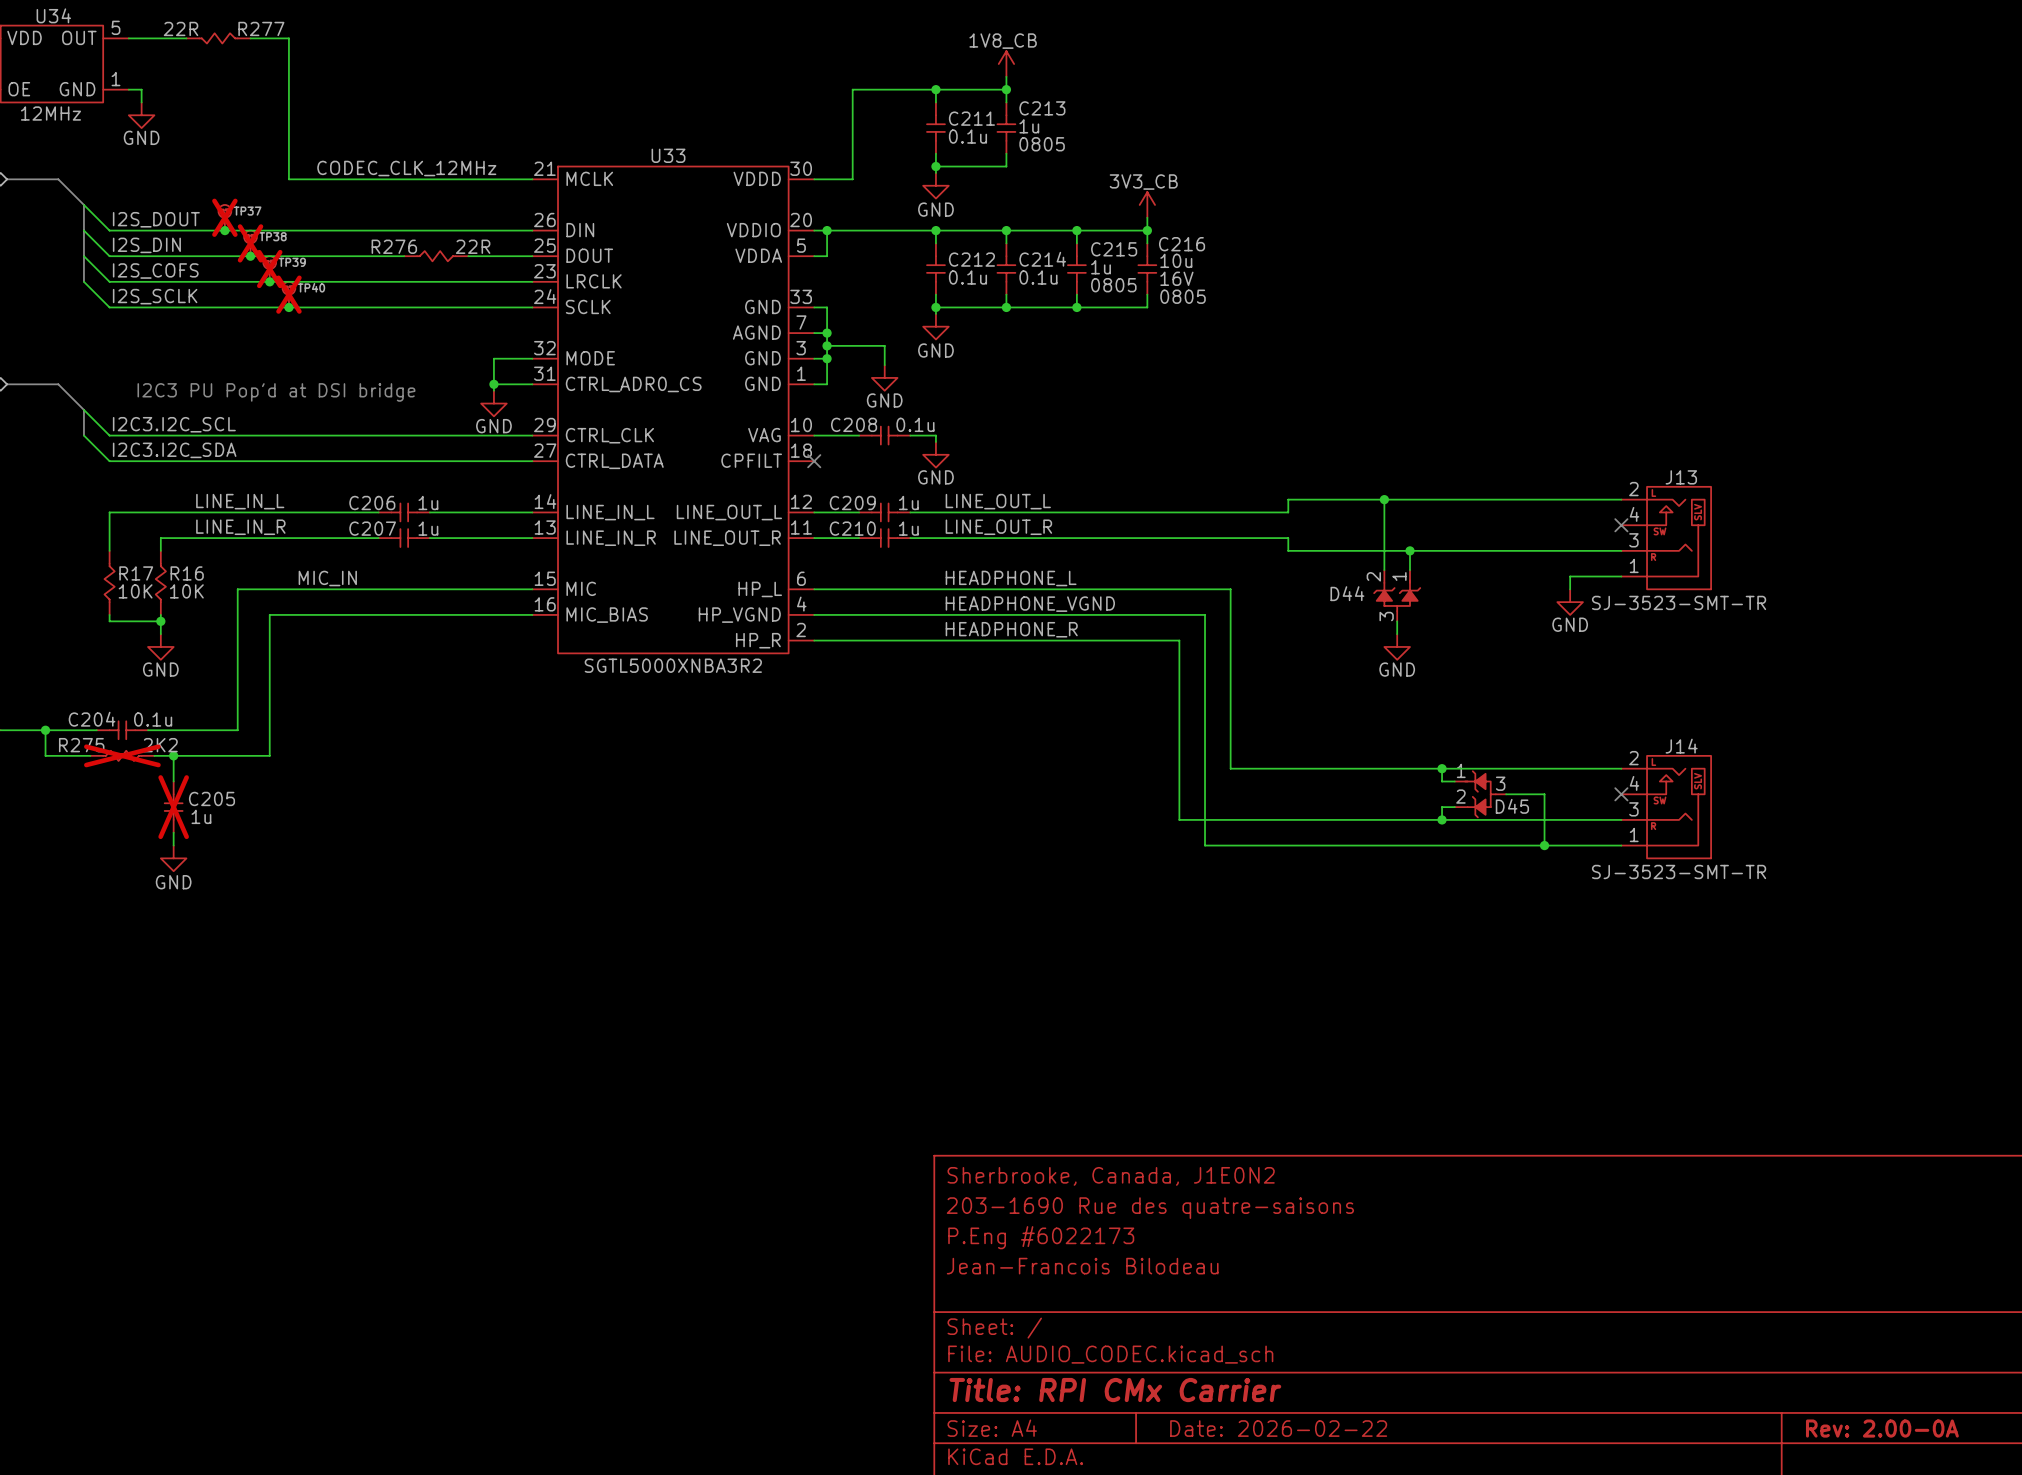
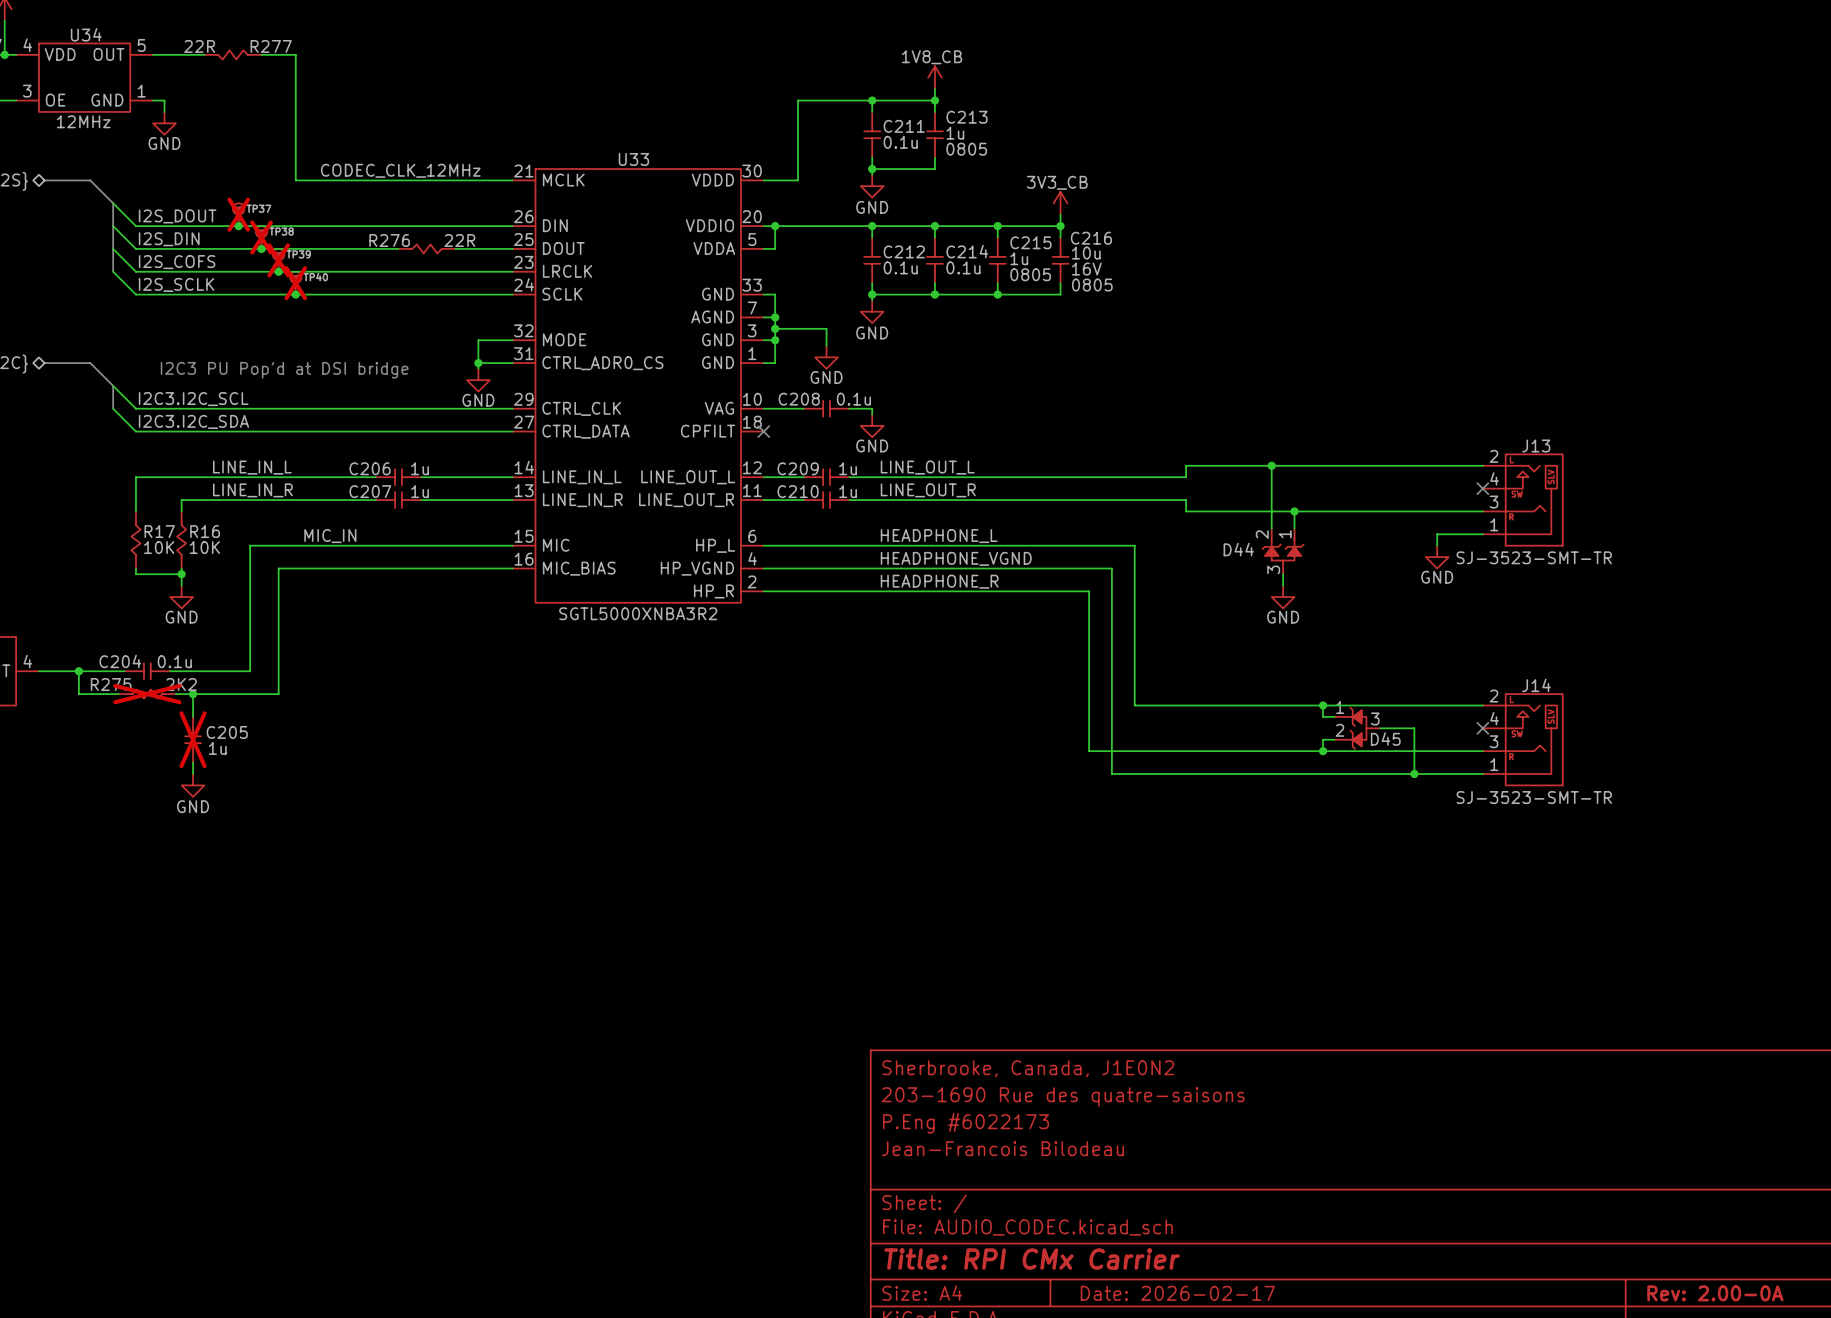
title block: Date: 2026-02-22 (1278, 1428) -> Date: 2026-02-17 (1177, 1293)

